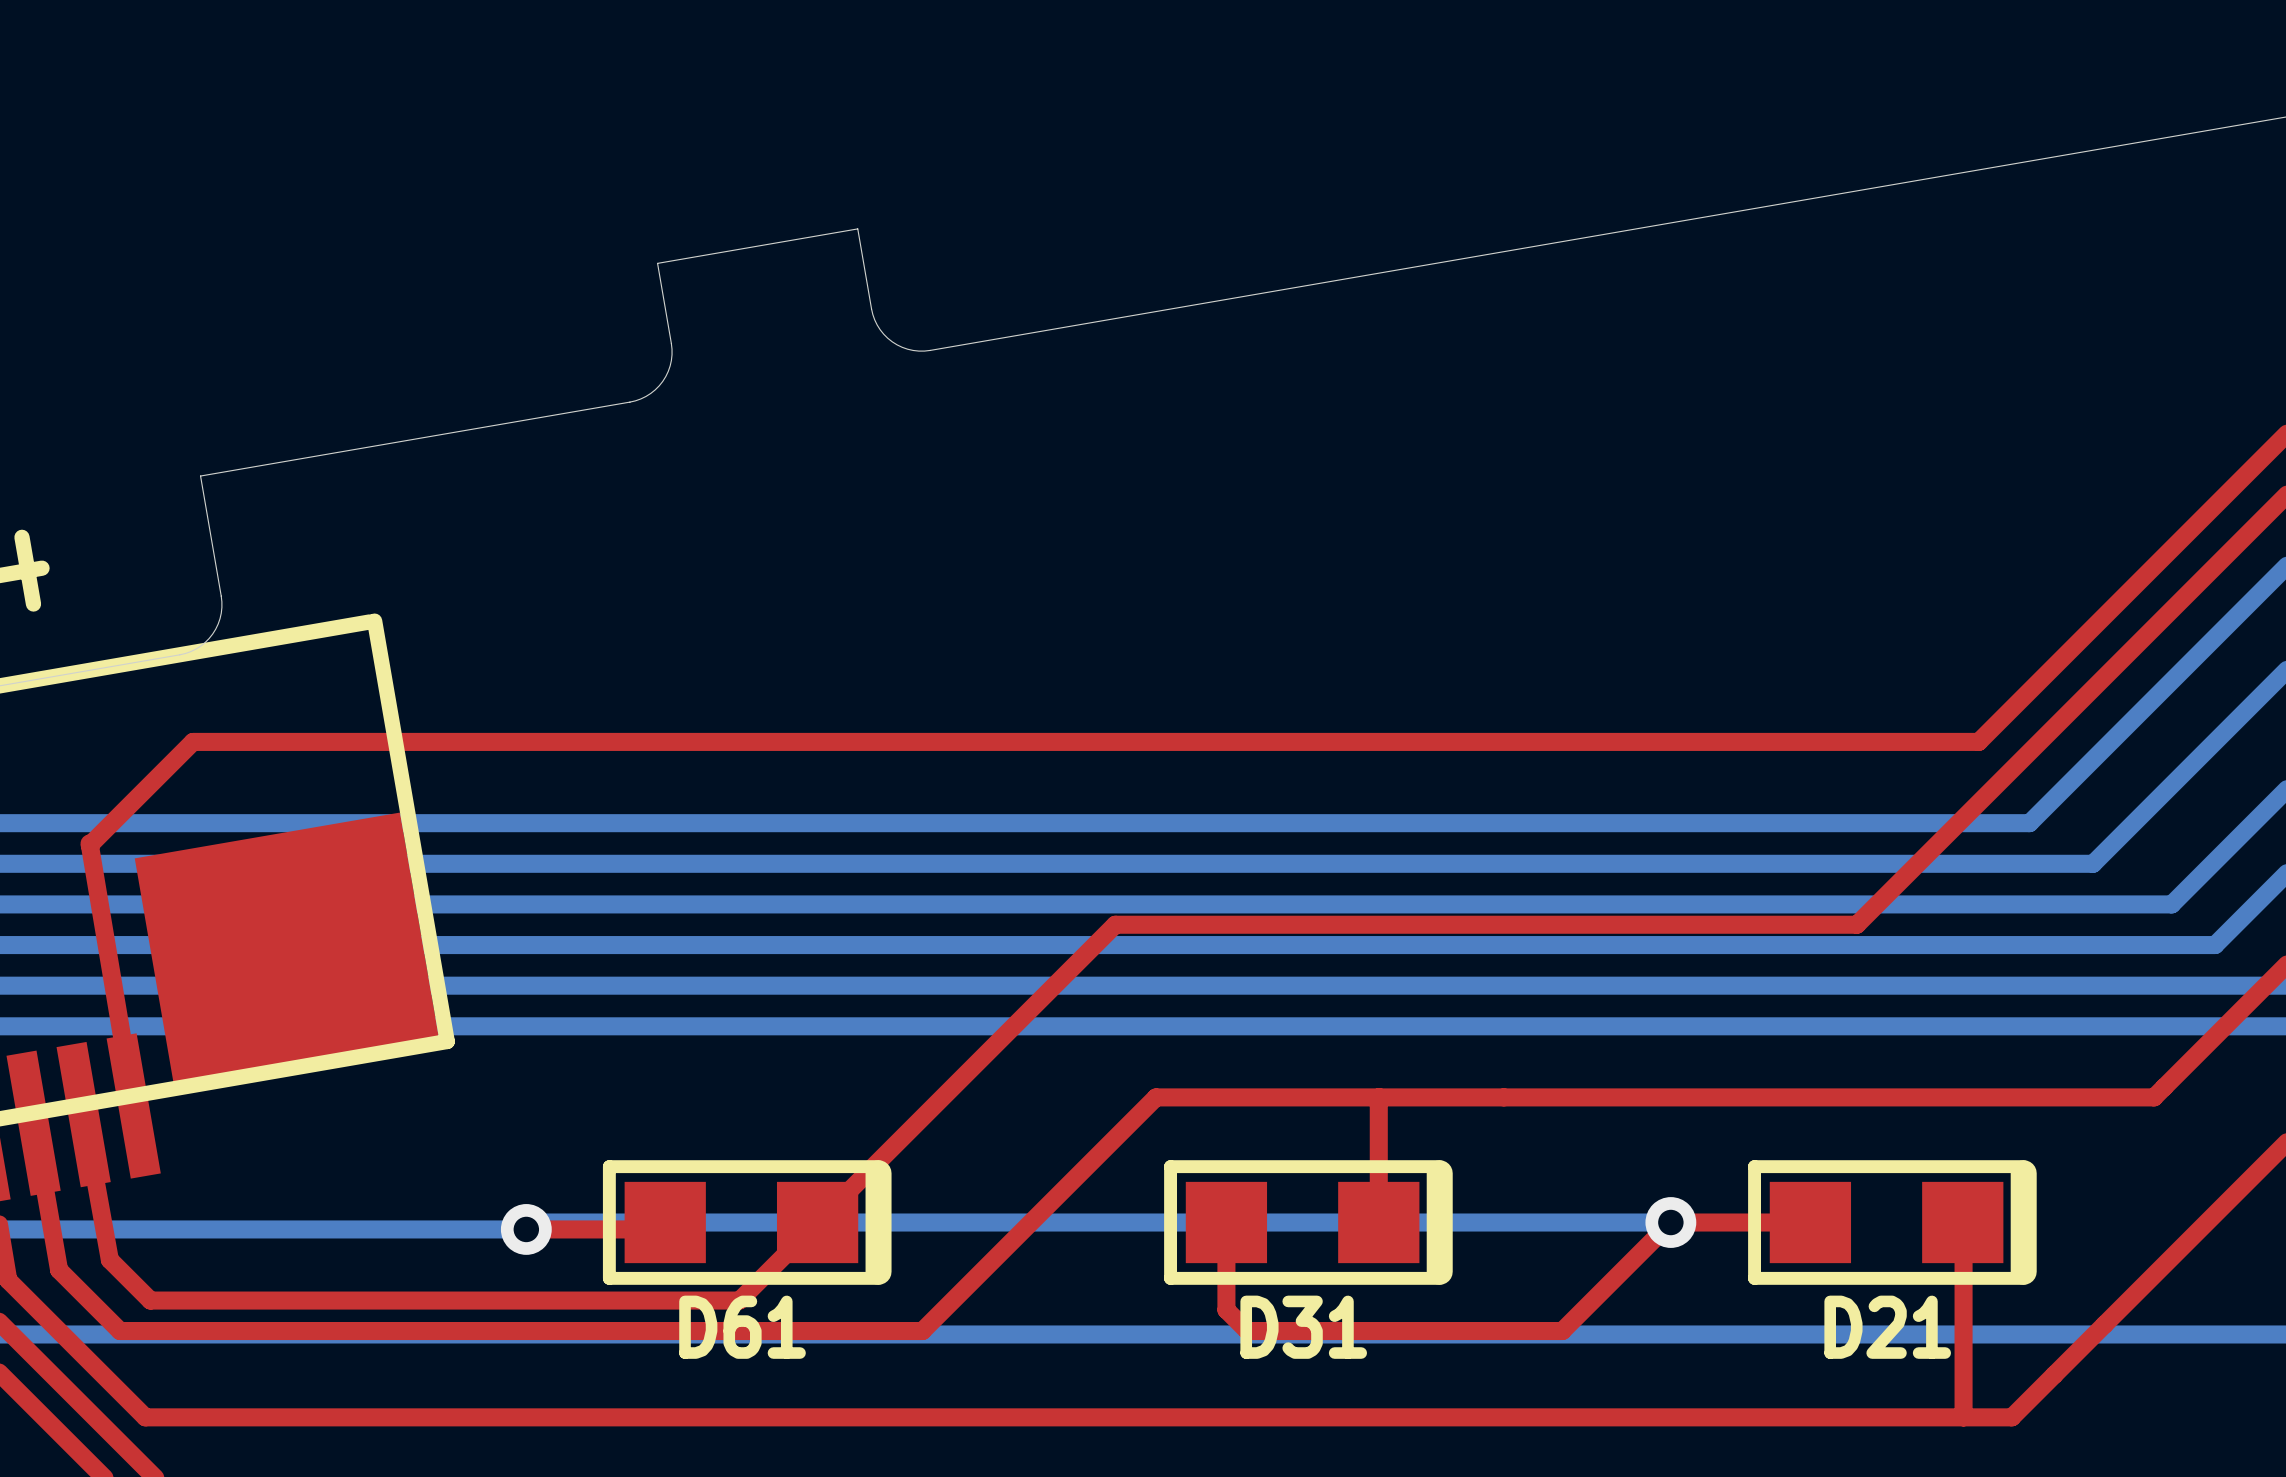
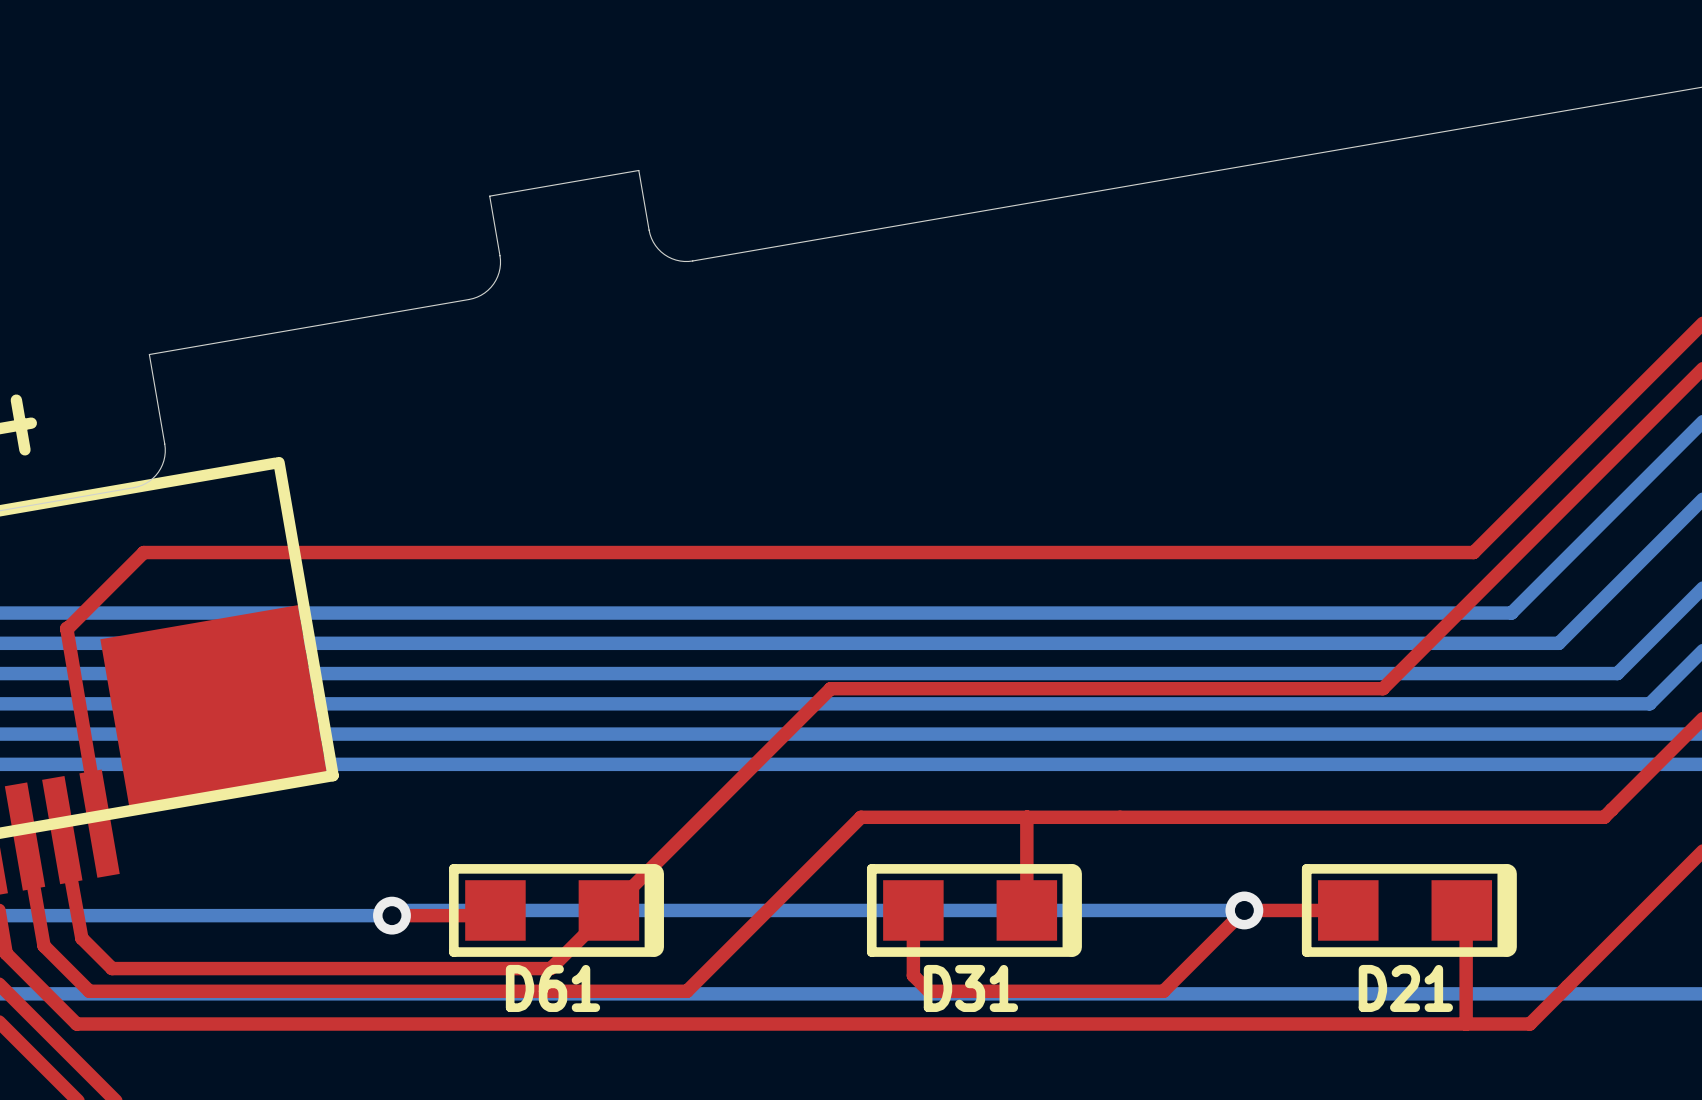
top track: (1963, 1223) (1963, 1417) -> (1462, 911) (1466, 914) (1466, 1024)
top track: (103, 1374) (145, 1417) (2011, 1417) (2054, 1374) -> (76, 1024) (1529, 1024)

